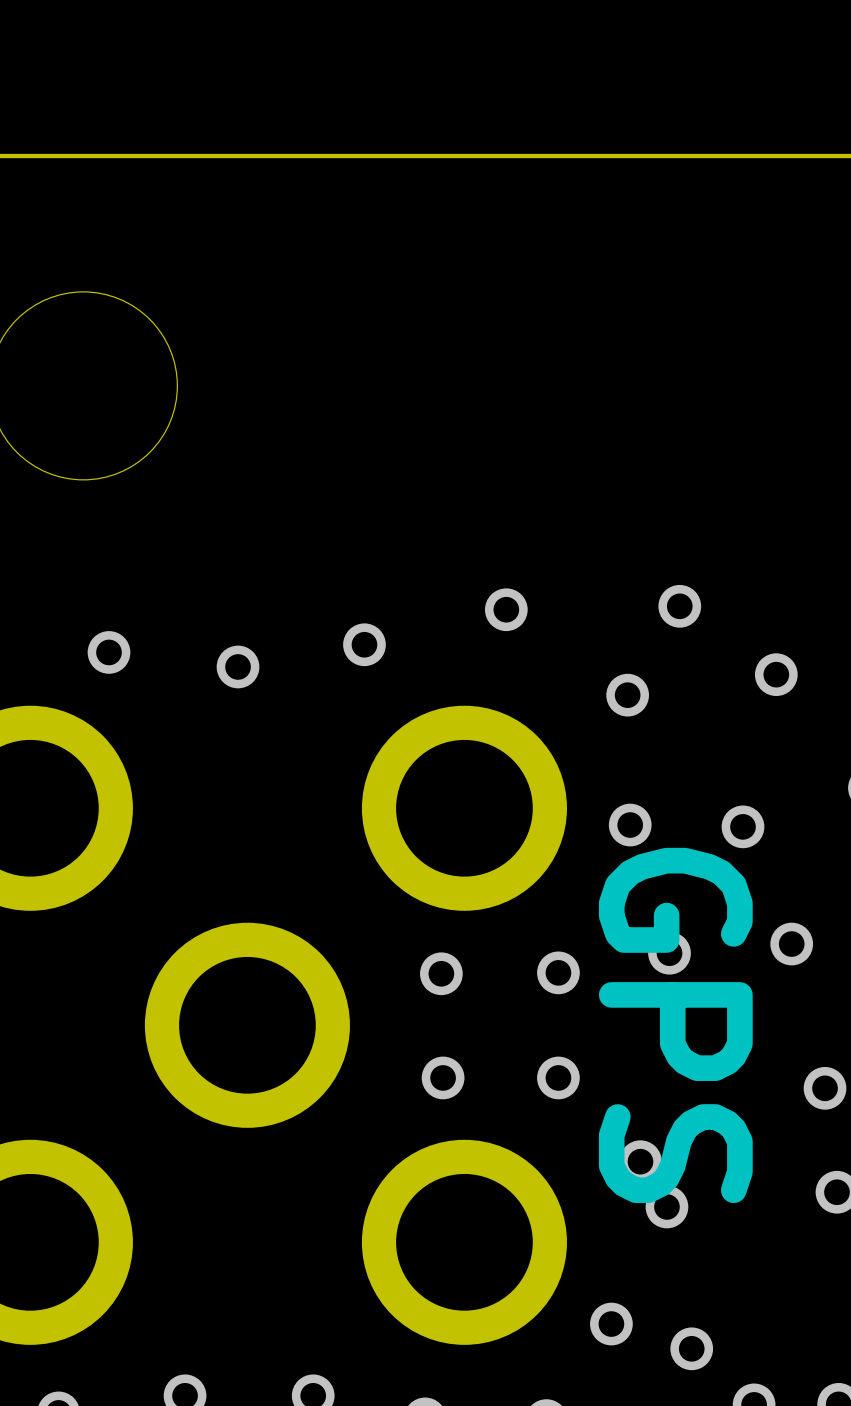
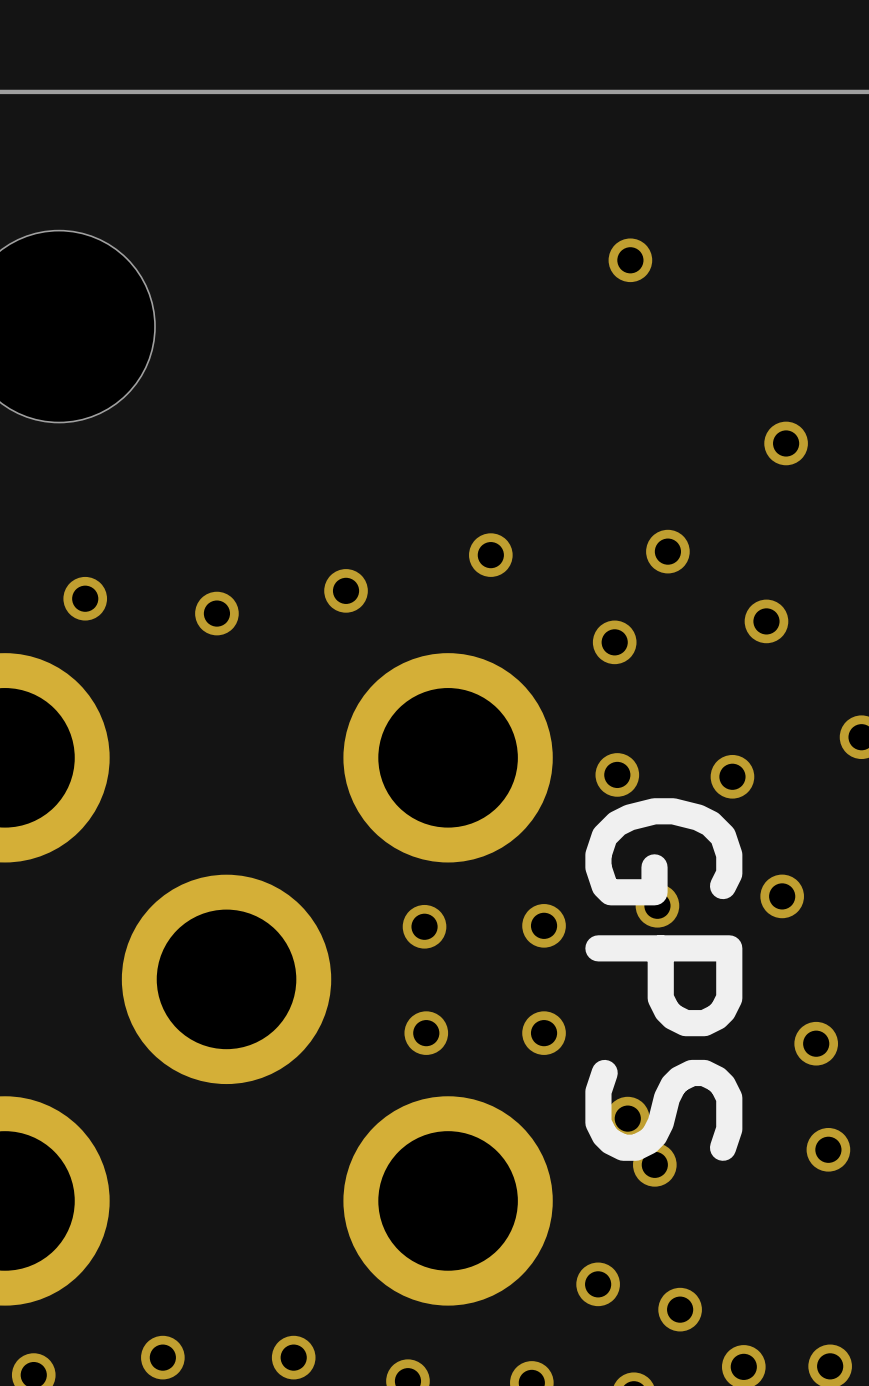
via: none -> (630, 260)
via: none -> (786, 443)

